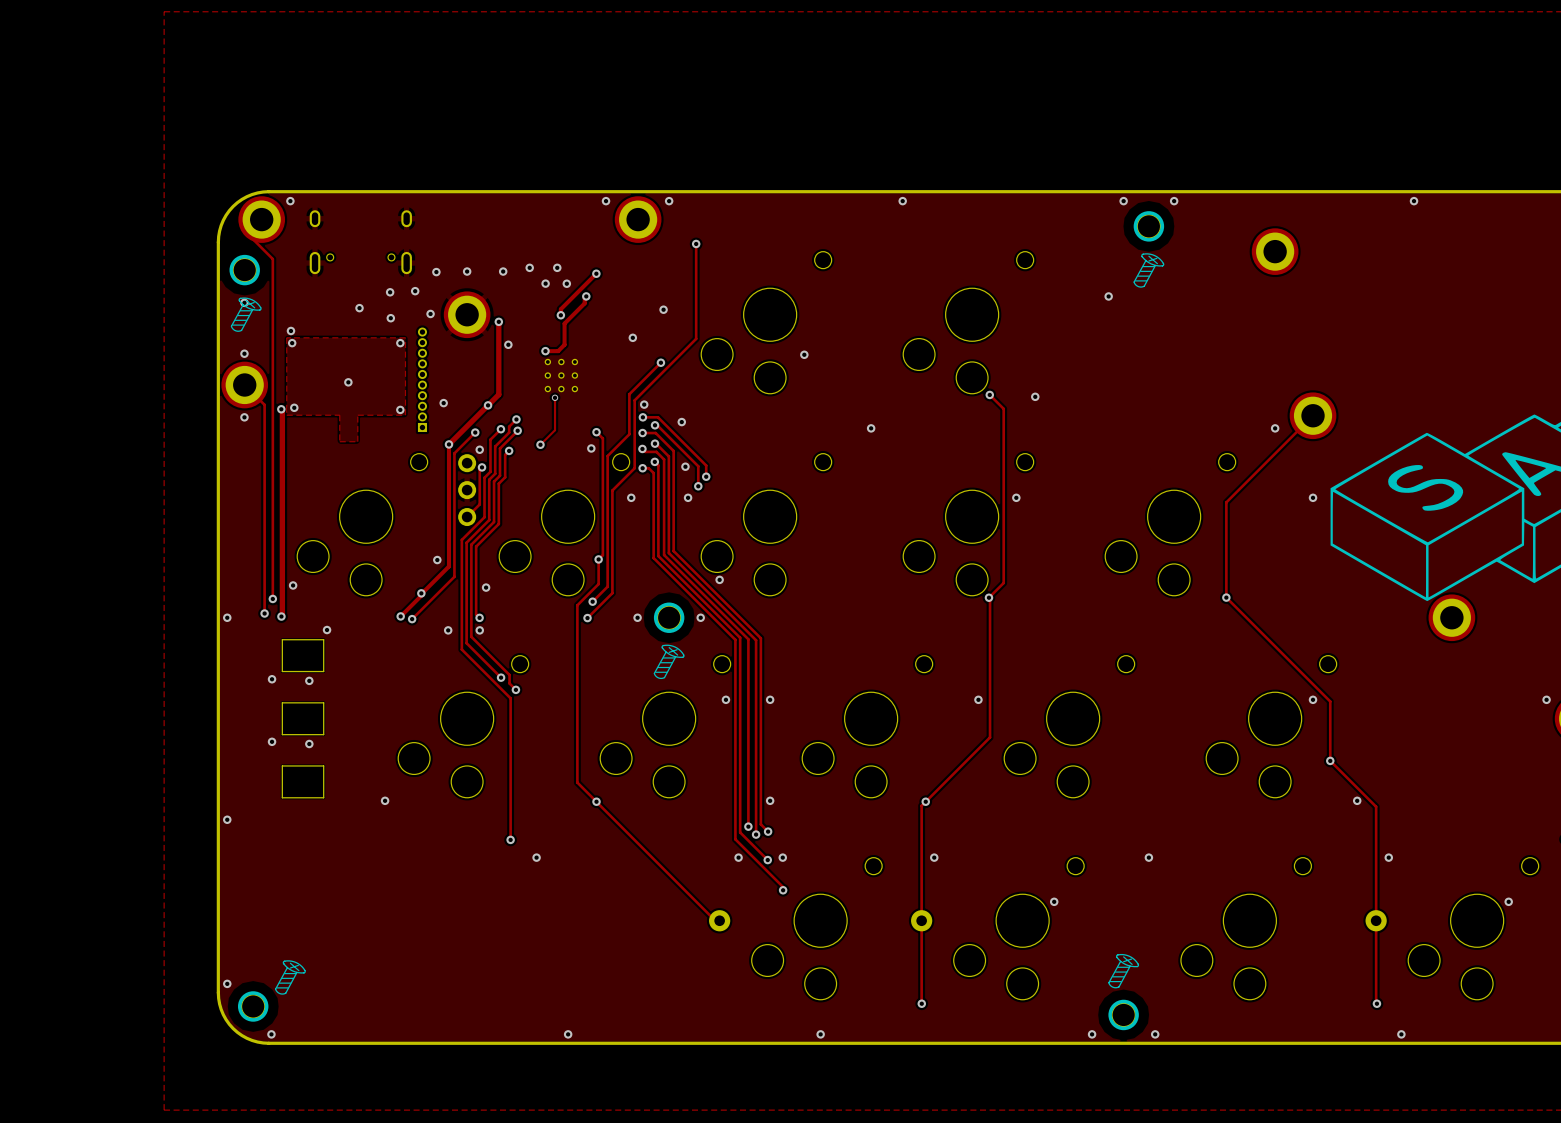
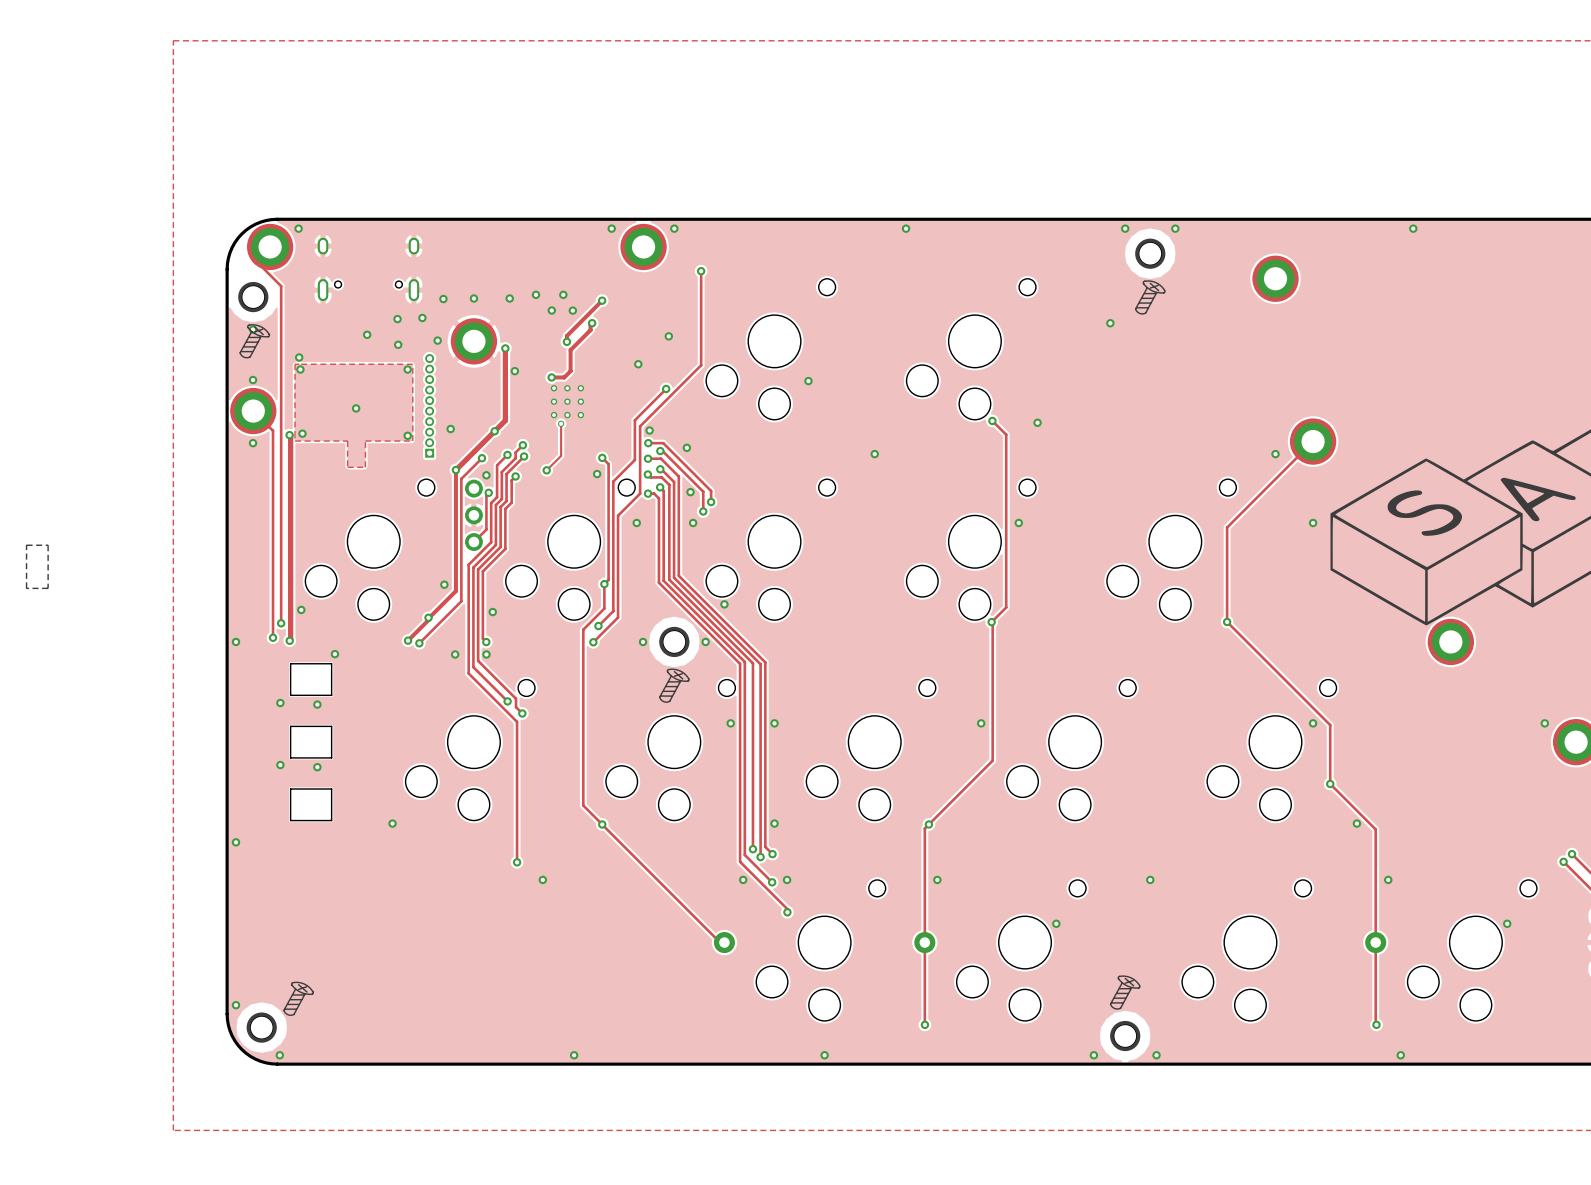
line: none -> (26, 545) (48, 545) (48, 588) (26, 588) (26, 545)

